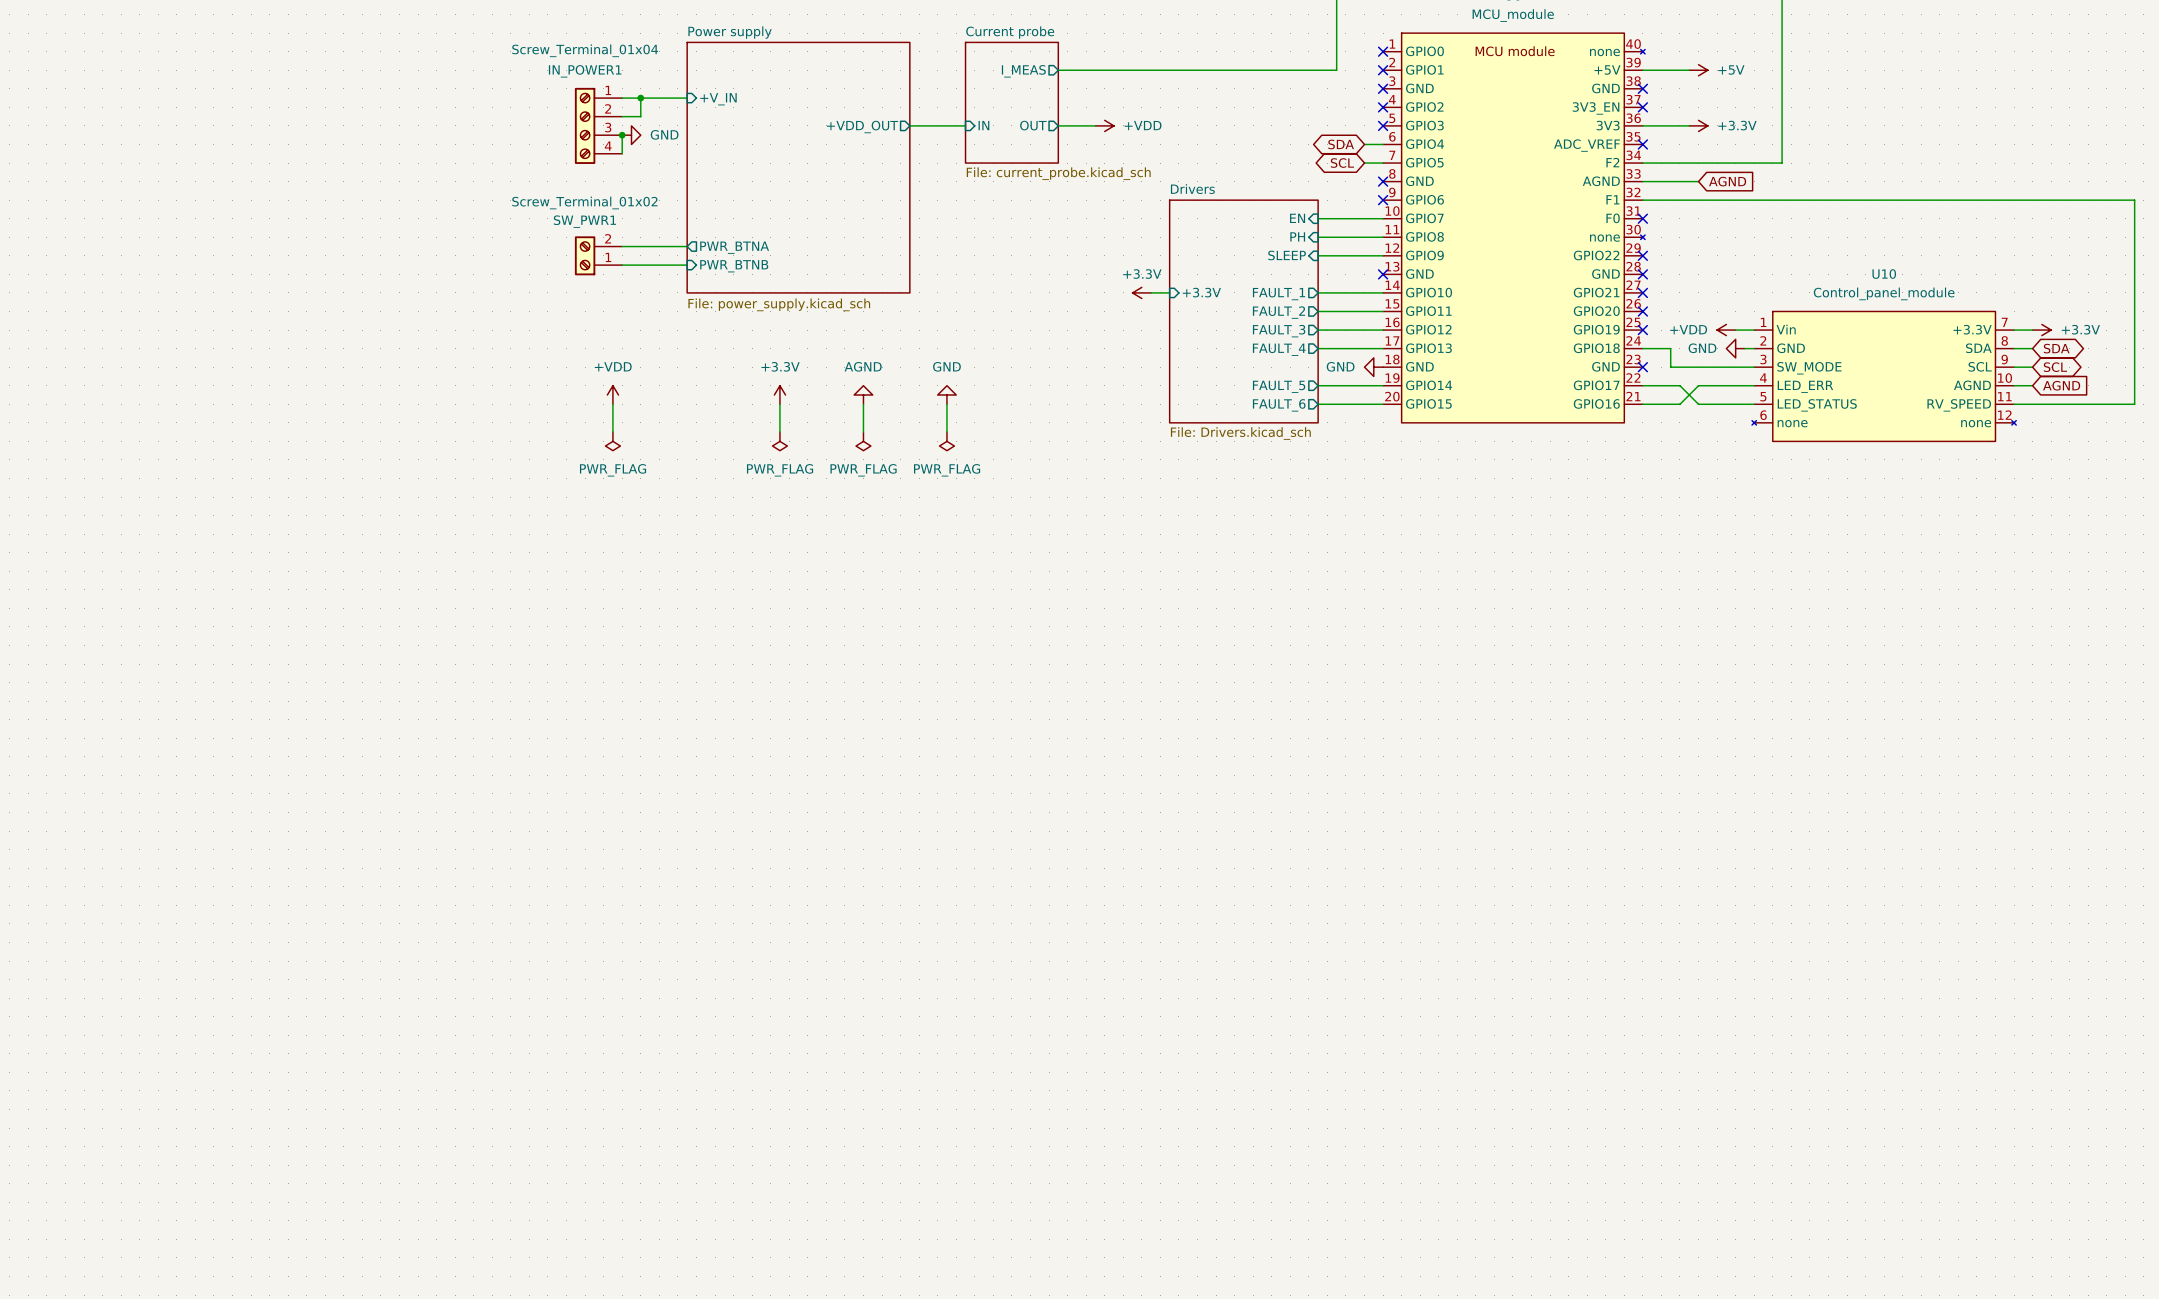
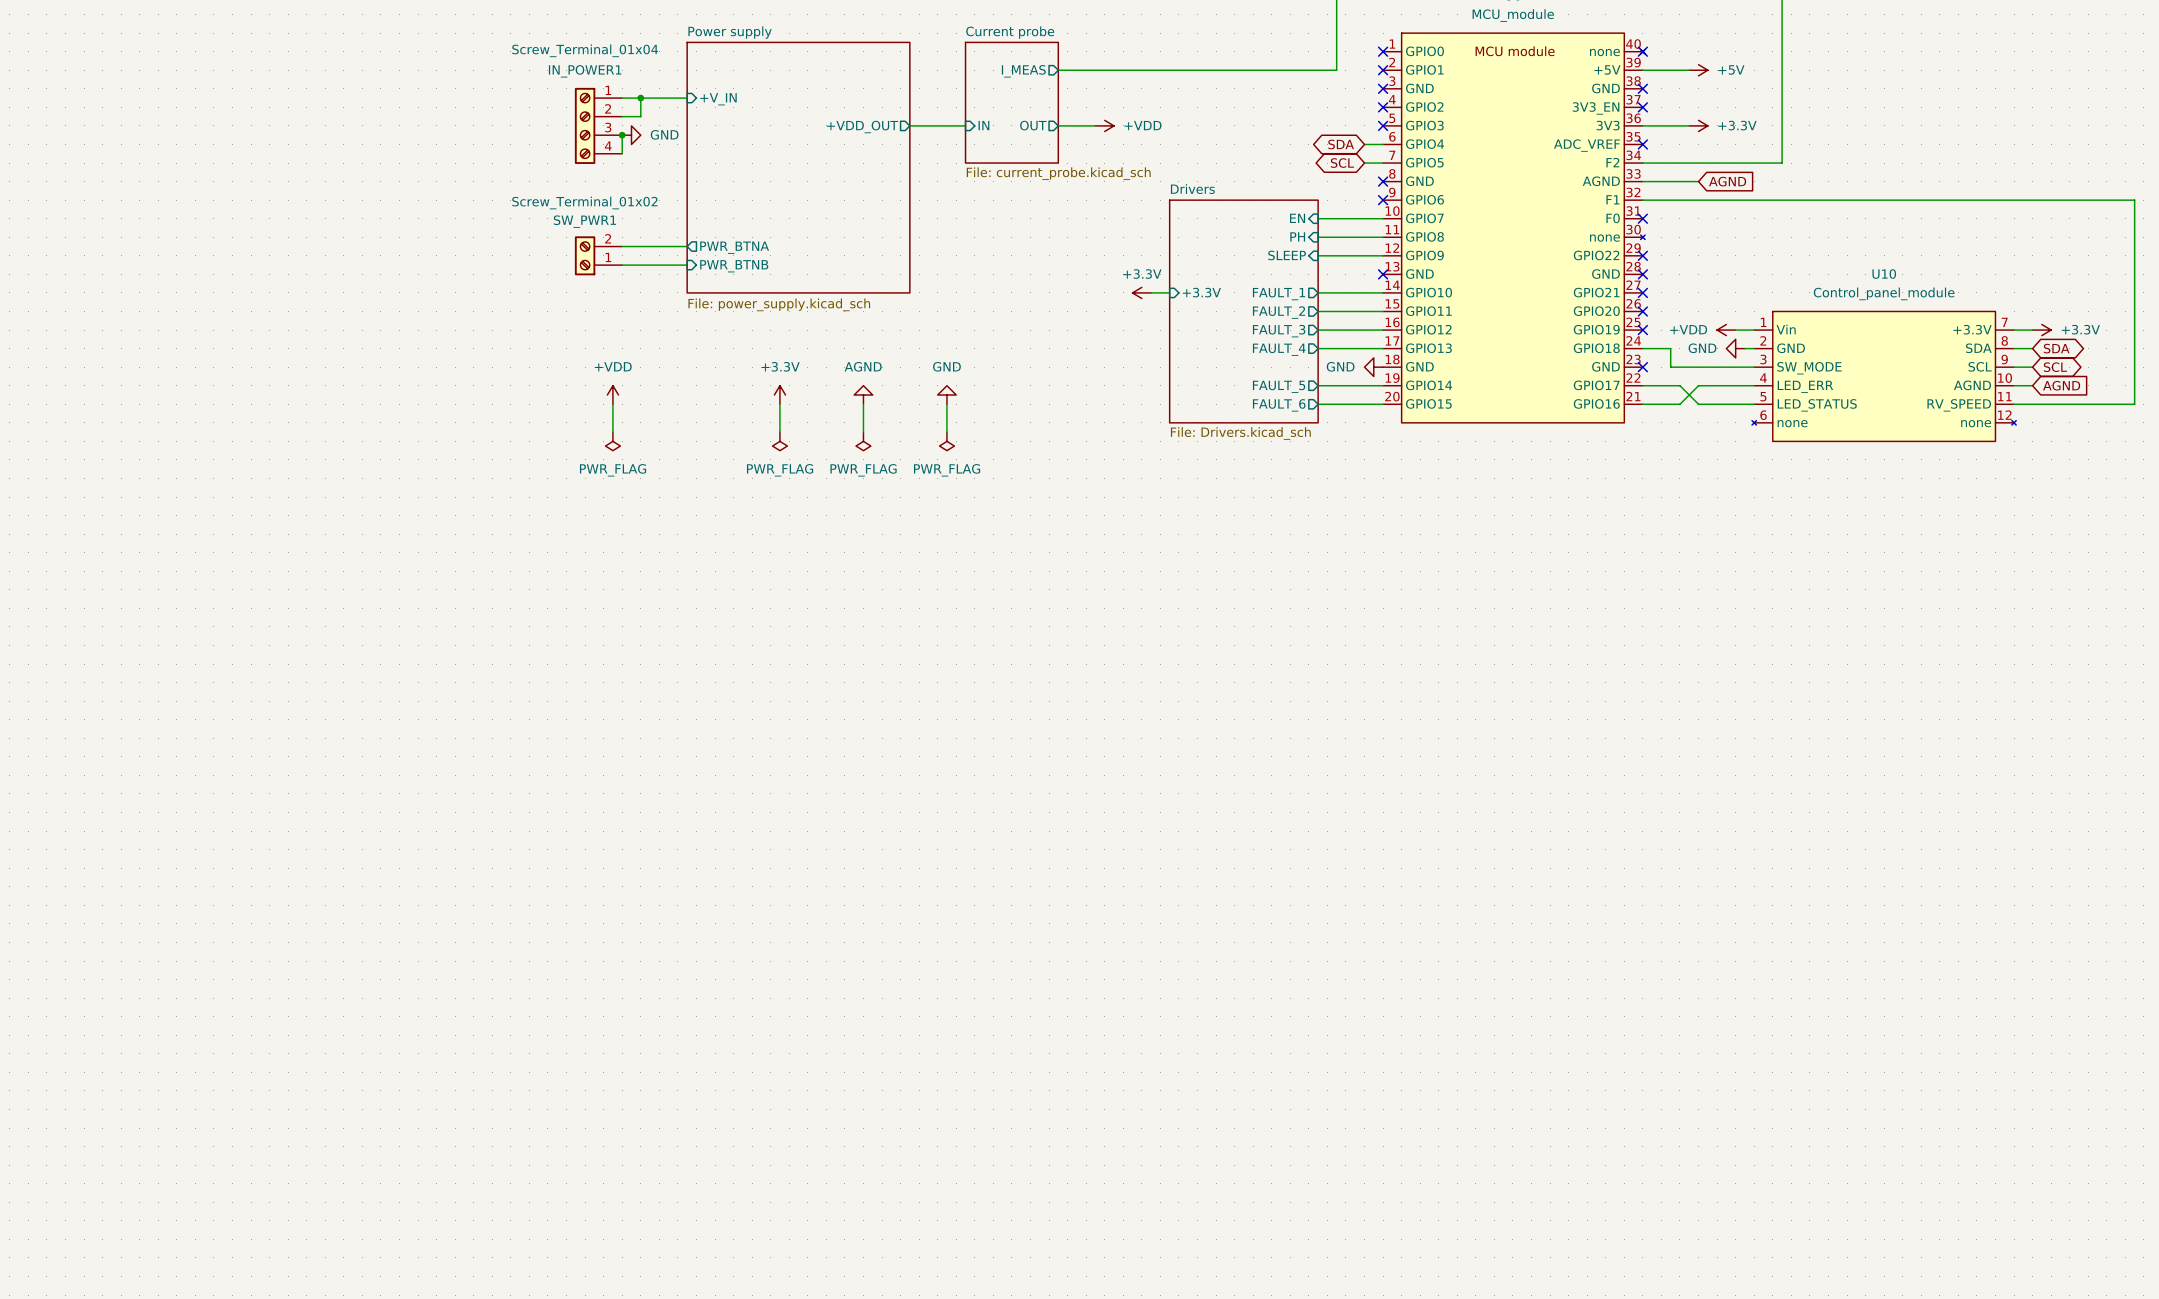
no-connect mark: none -> (1642, 51)

